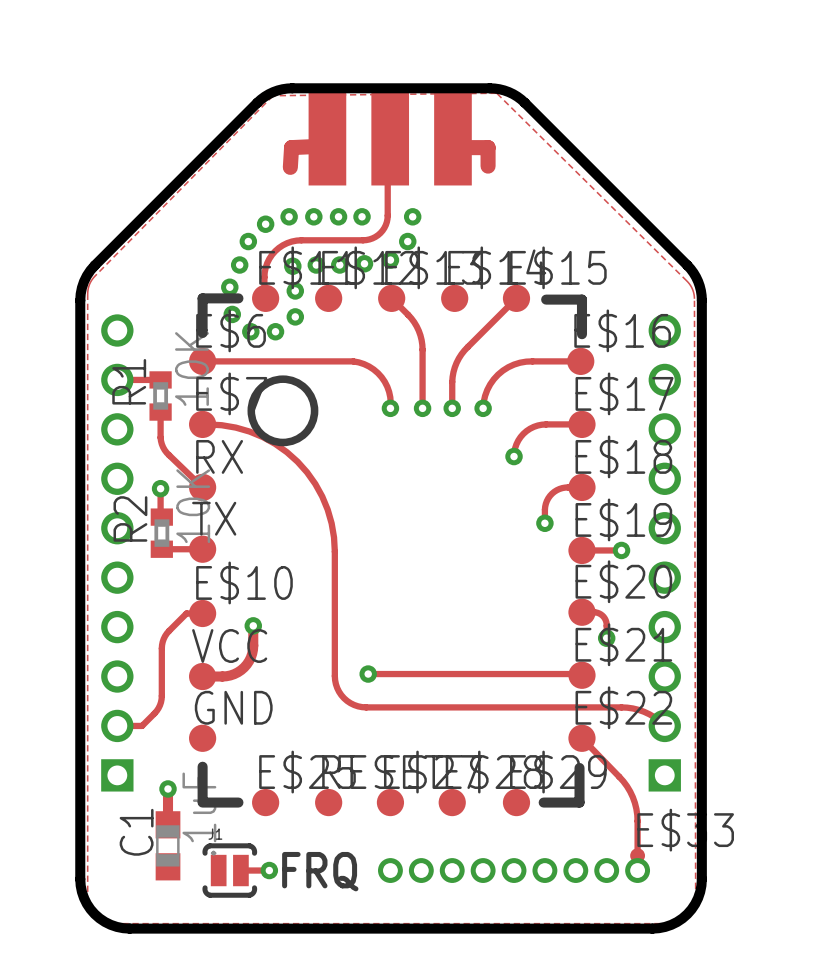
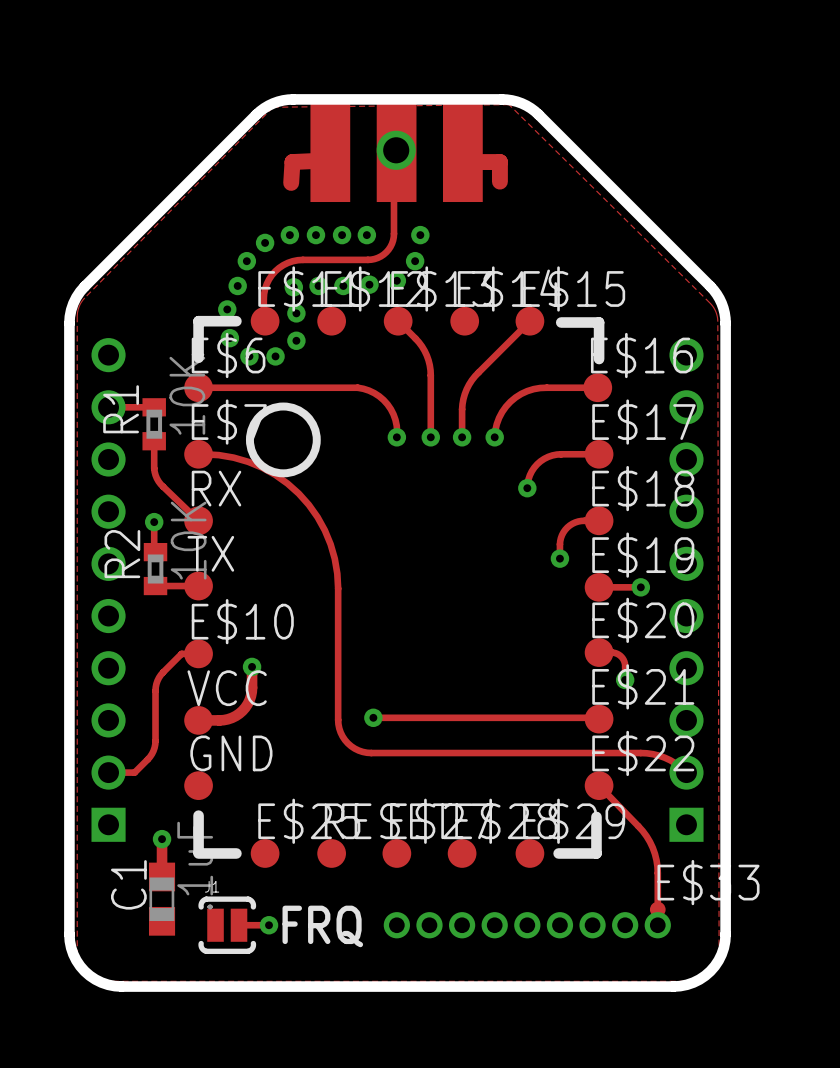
via: none -> (396, 150)

